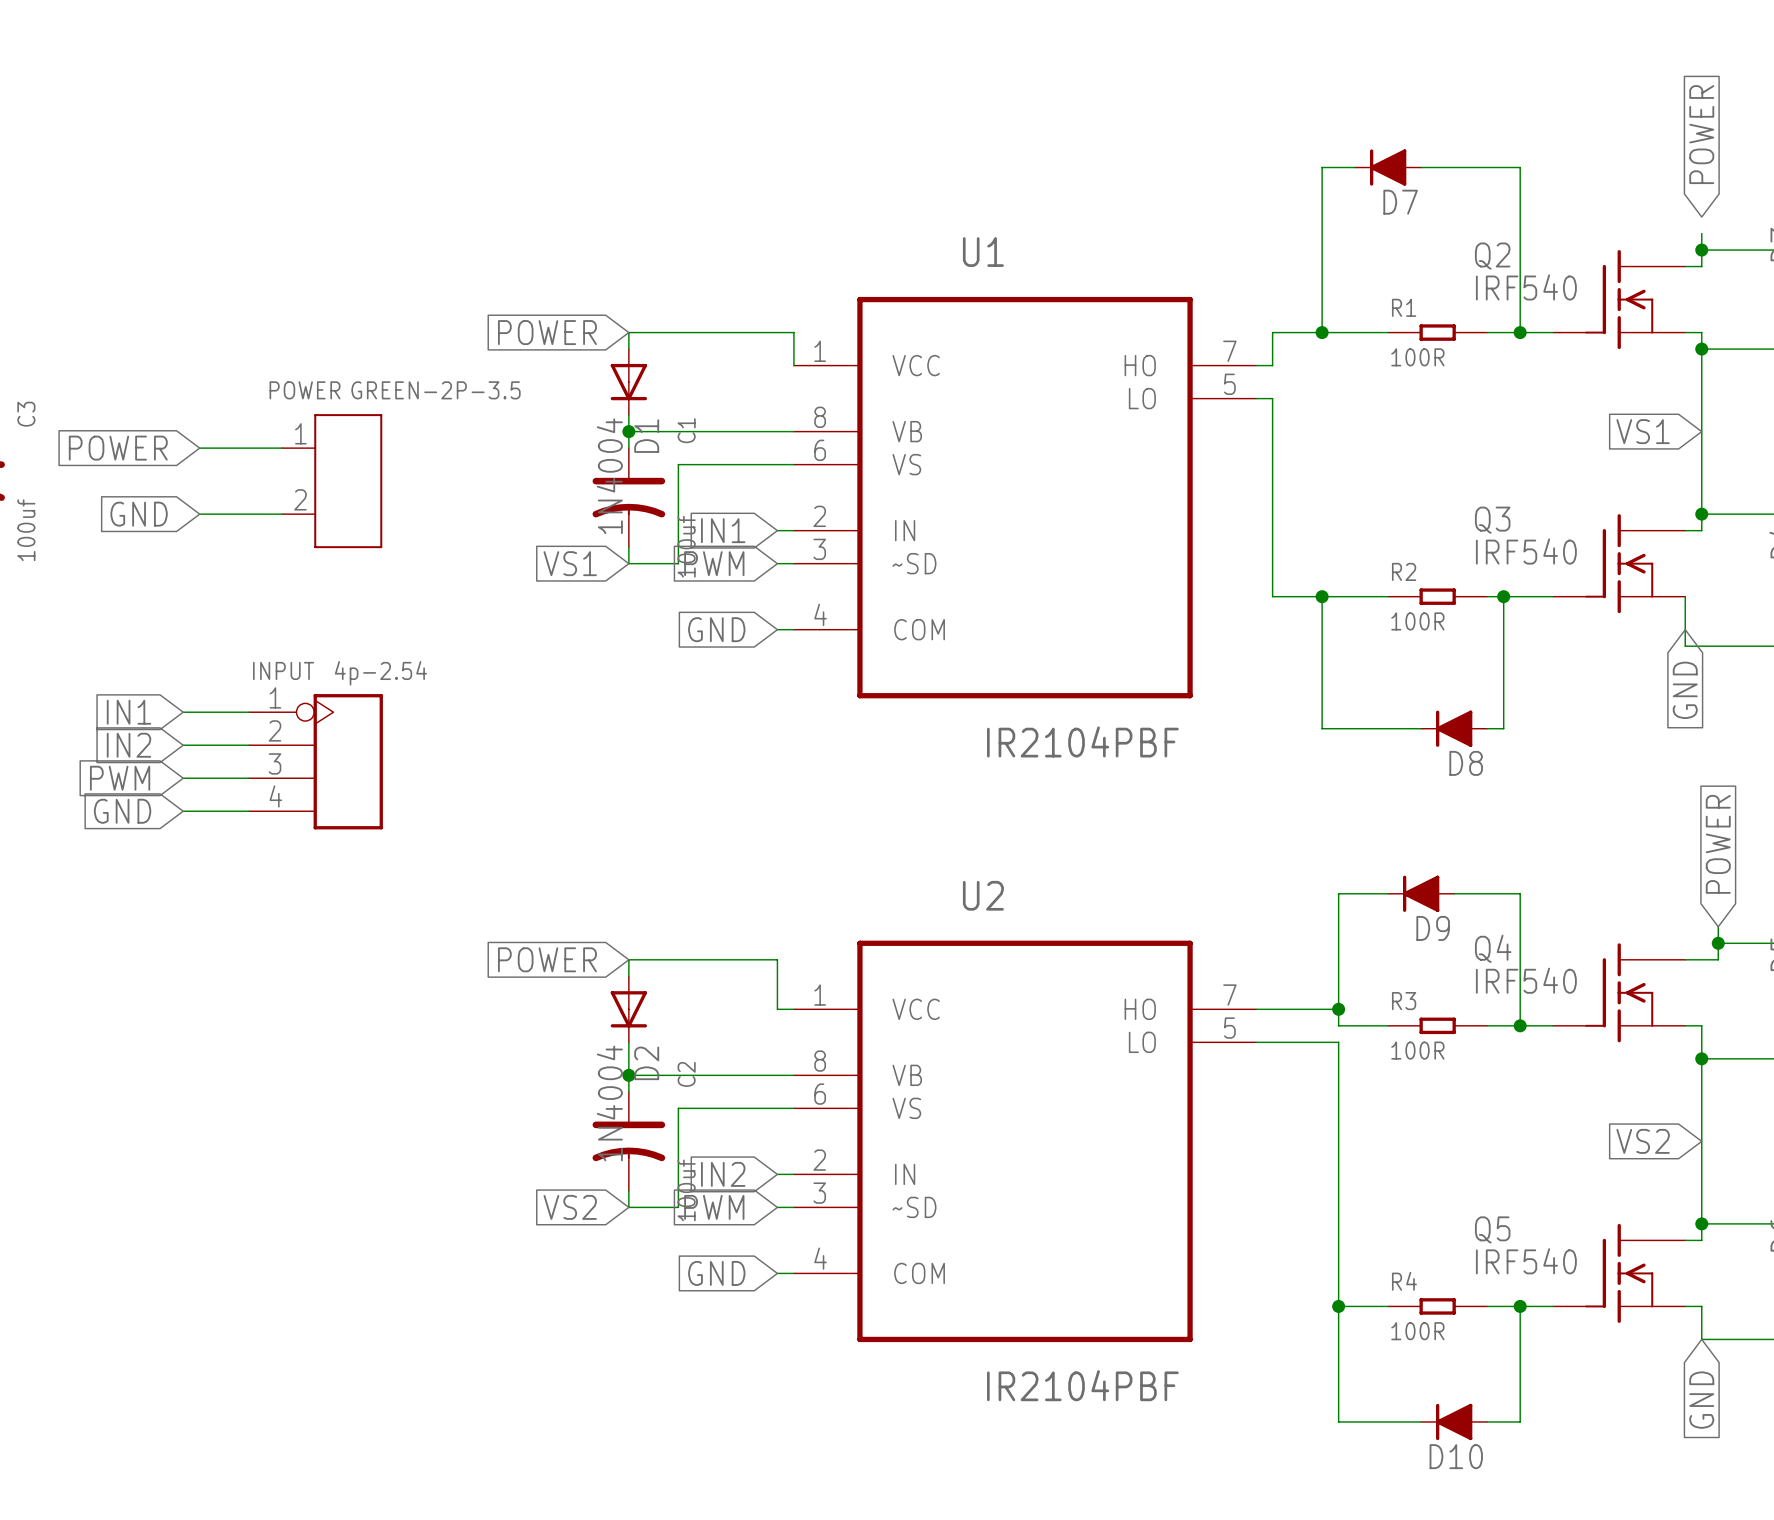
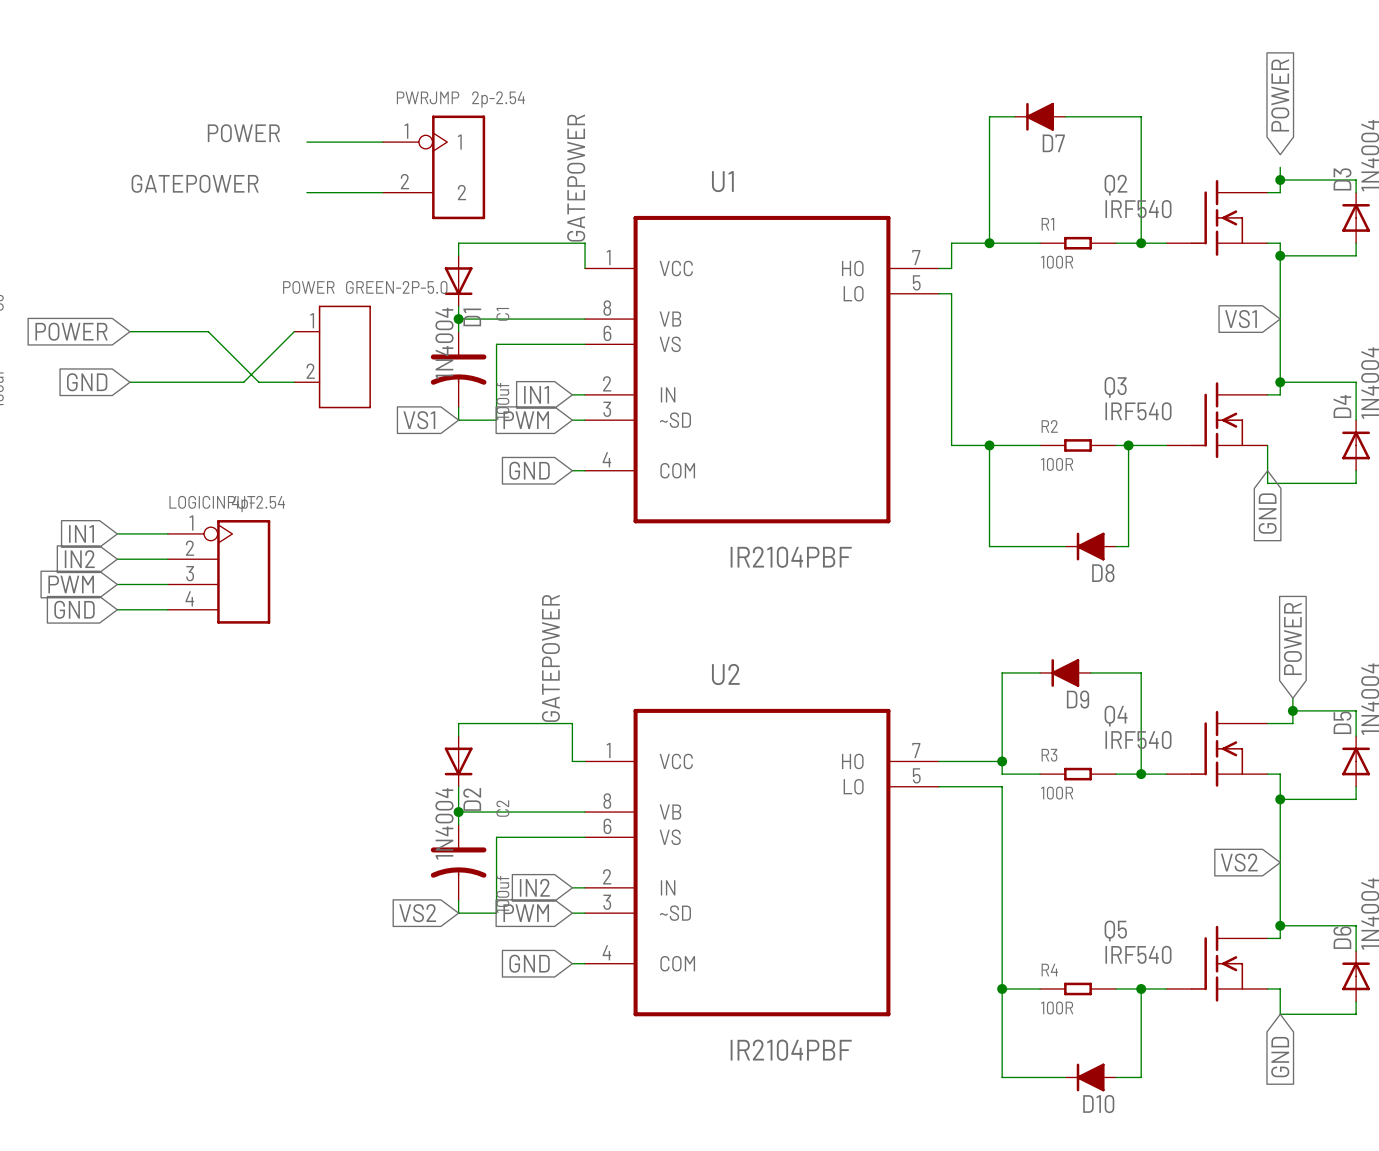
label: none -> POWER (243, 133)
wire: none -> (306, 142) (382, 142)
PWRJMP: none -> 2p-2.54 (433, 167)
label: none -> GATEPOWER (576, 178)
label: none -> GATEPOWER (195, 183)
wire: none -> (306, 192) (382, 192)
global label: POWER (547, 332) -> none
wire: none -> (193, 331) (208, 331) (258, 382) (294, 382)
wire: none -> (294, 331) (243, 382) (193, 382)
POWER: GREEN-2P-3.5 (332, 481) -> none
POWER: none -> GREEN-2P-5.0 (332, 356)
INPUT name: INPUT (283, 670) -> LOGICINPUT (212, 502)
label: none -> GATEPOWER (550, 658)
global label: POWER (547, 959) -> none

